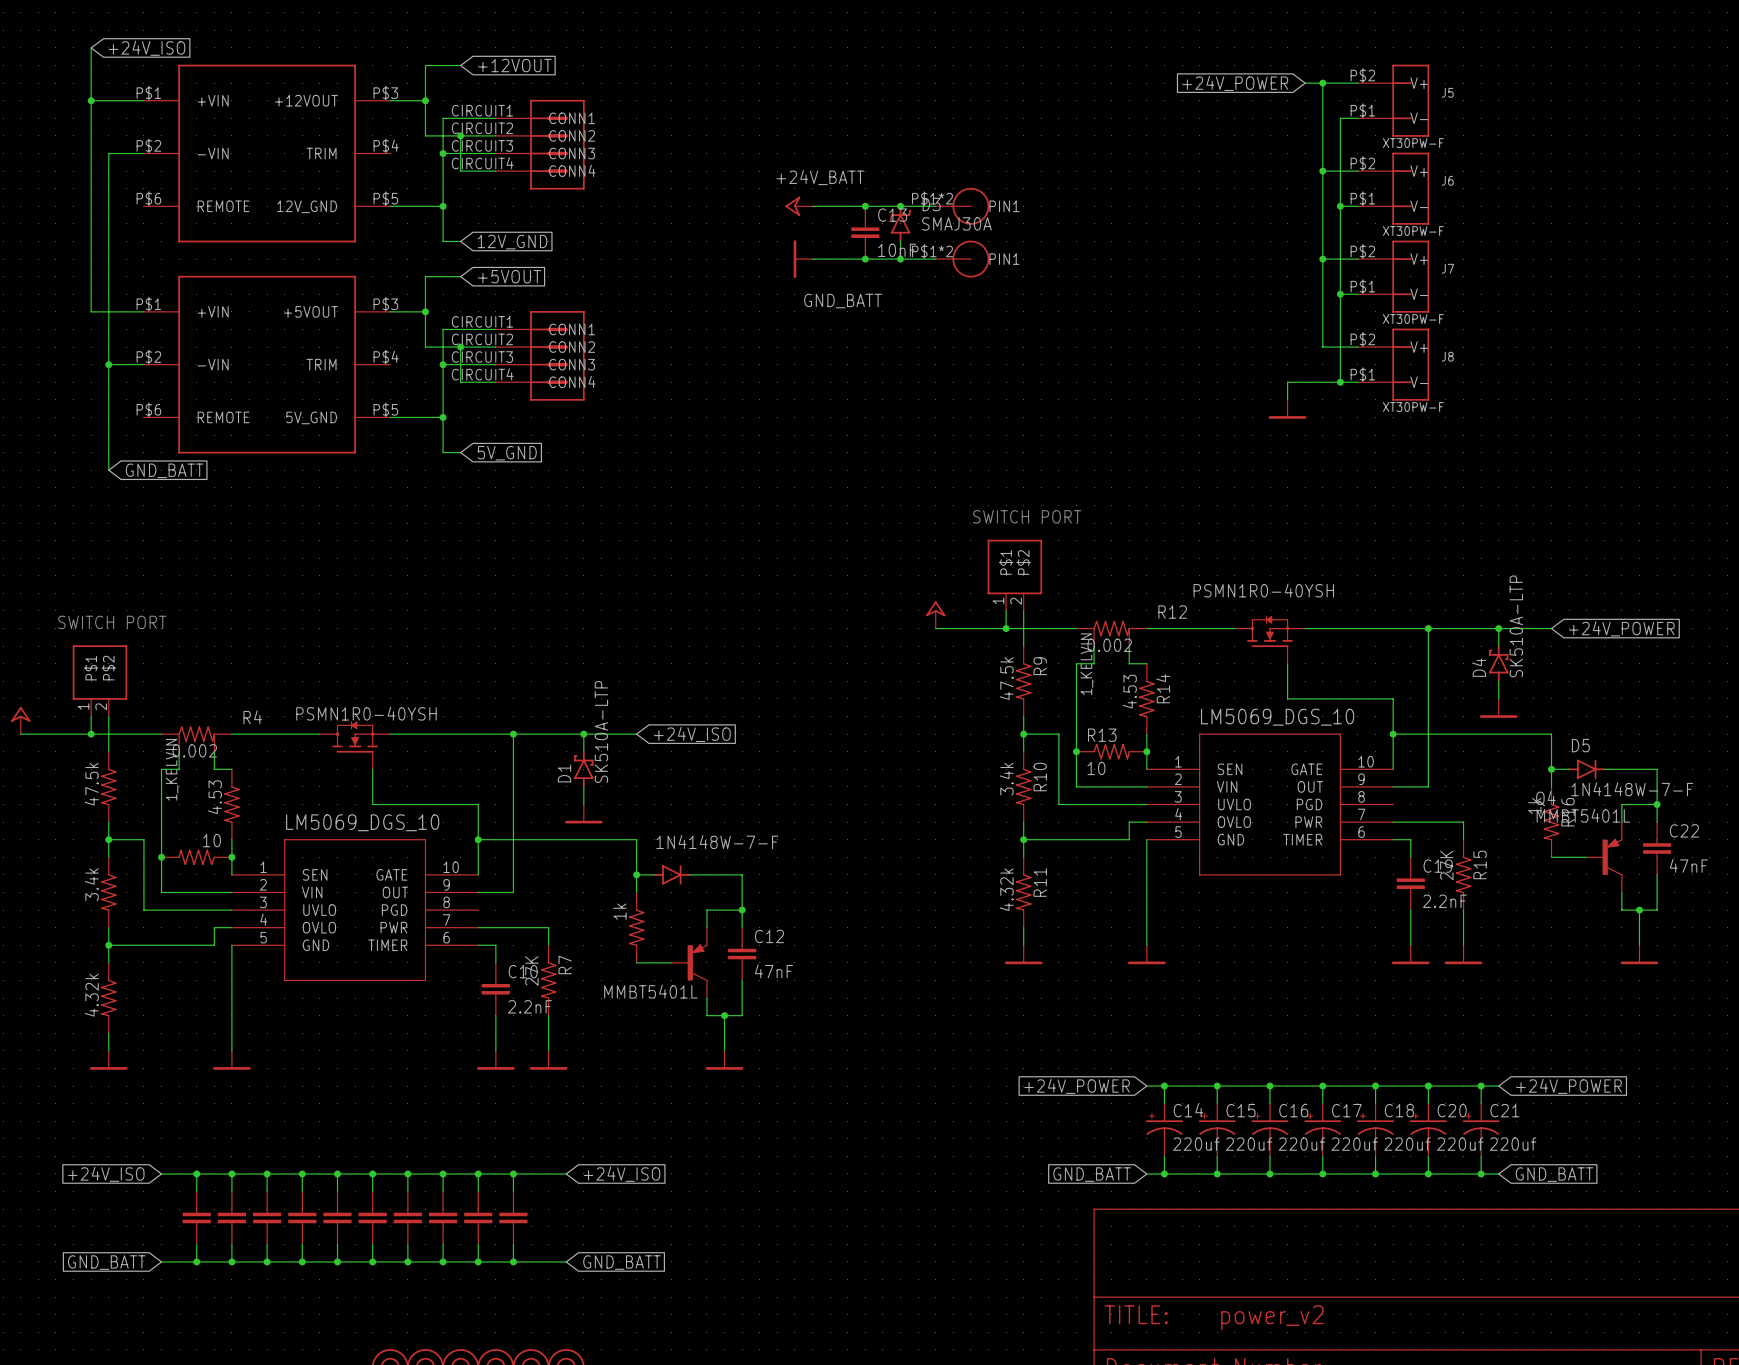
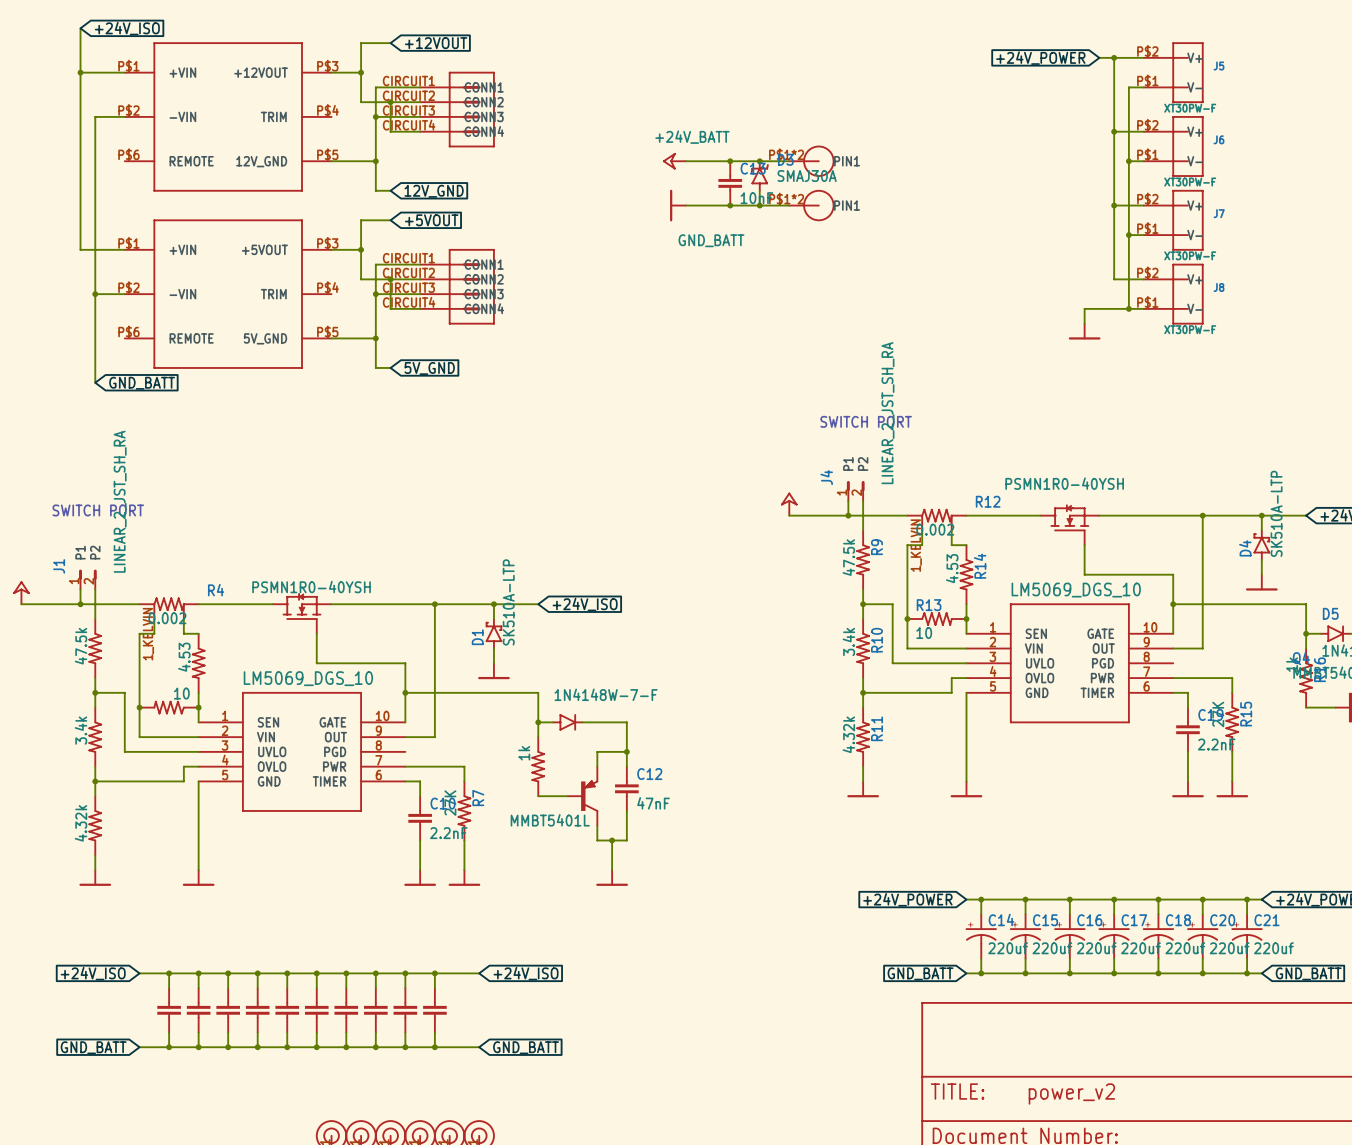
part: (1014, 575) -> none
J4: none -> LINEAR_2_JST_SH_RA (855, 490)
part: (99, 680) -> none
J1: none -> LINEAR_2_JST_SH_RA (87, 579)

